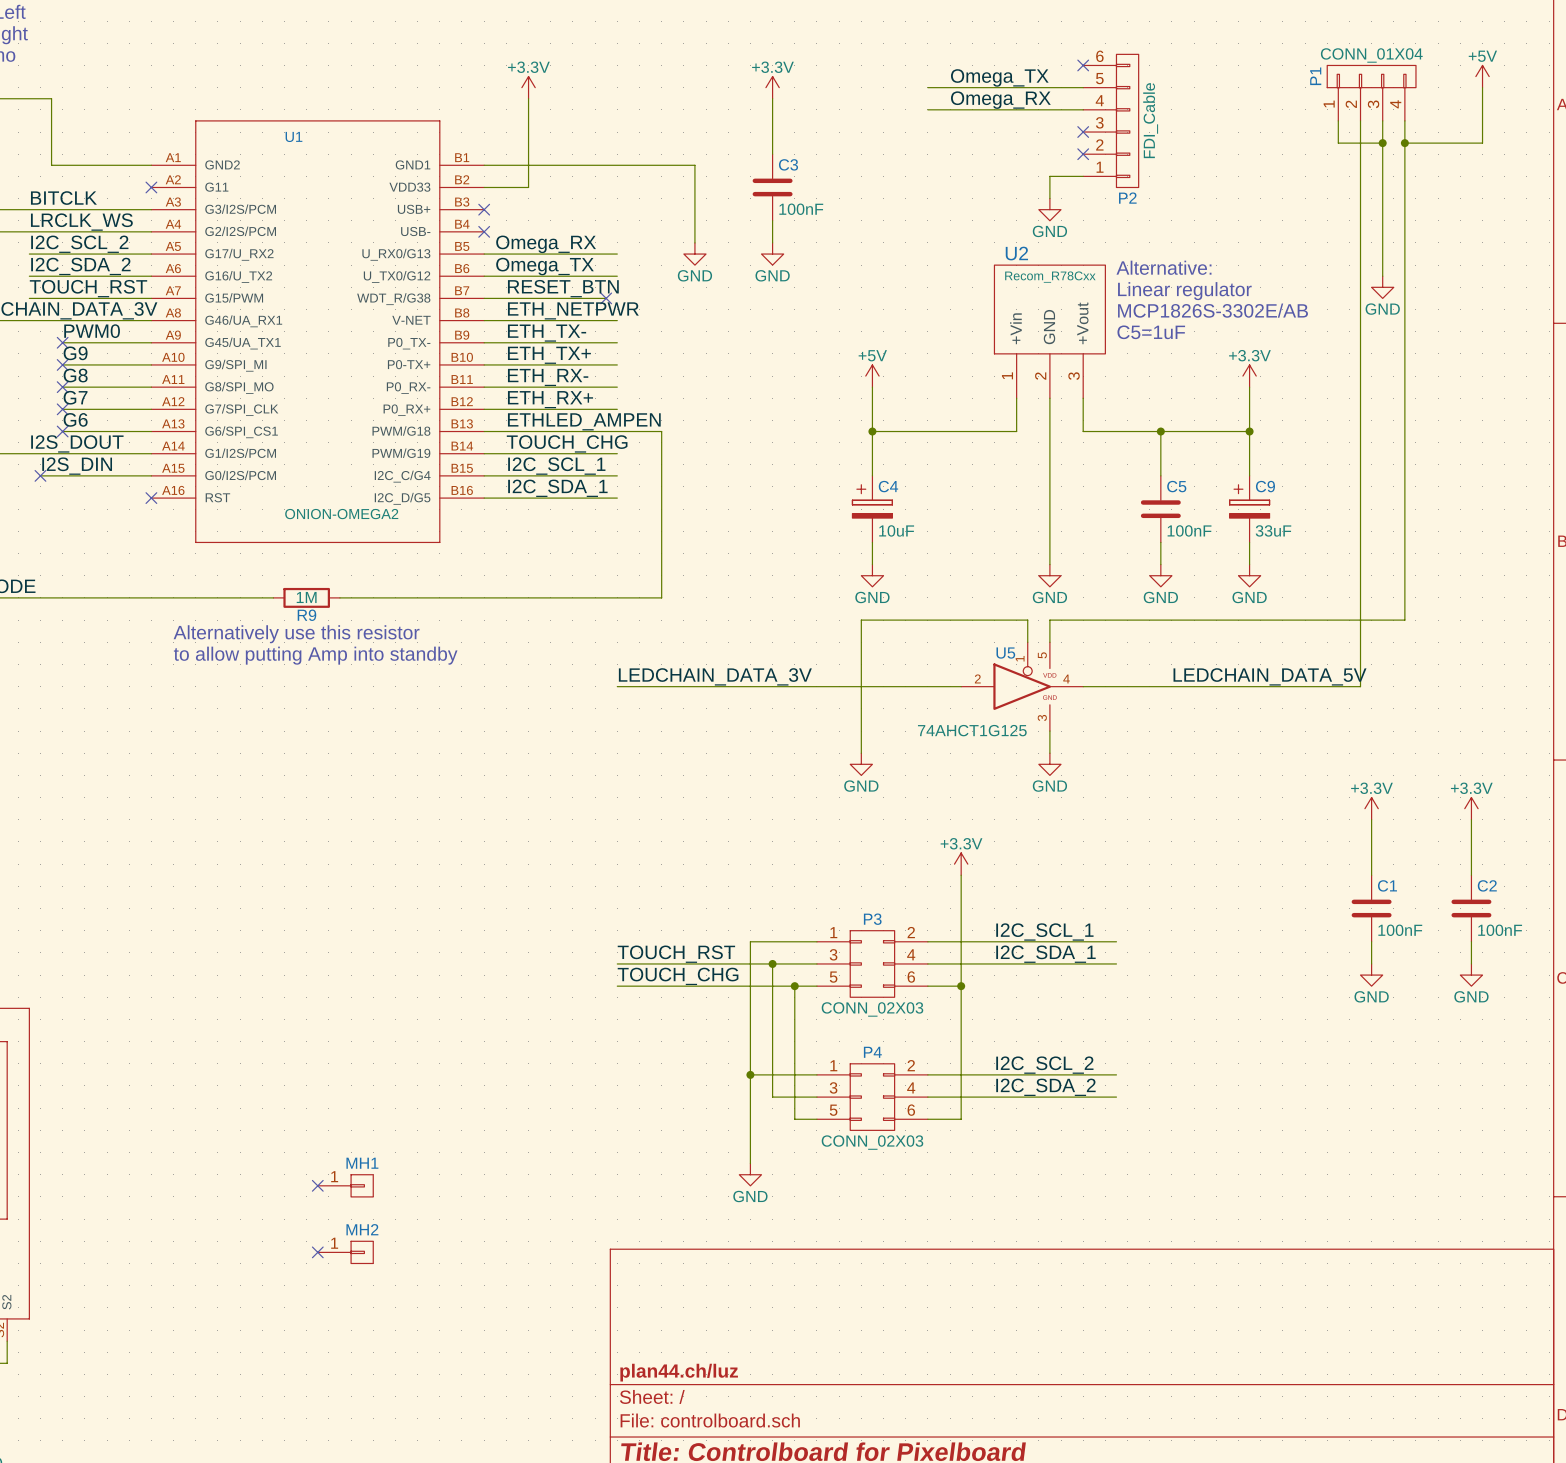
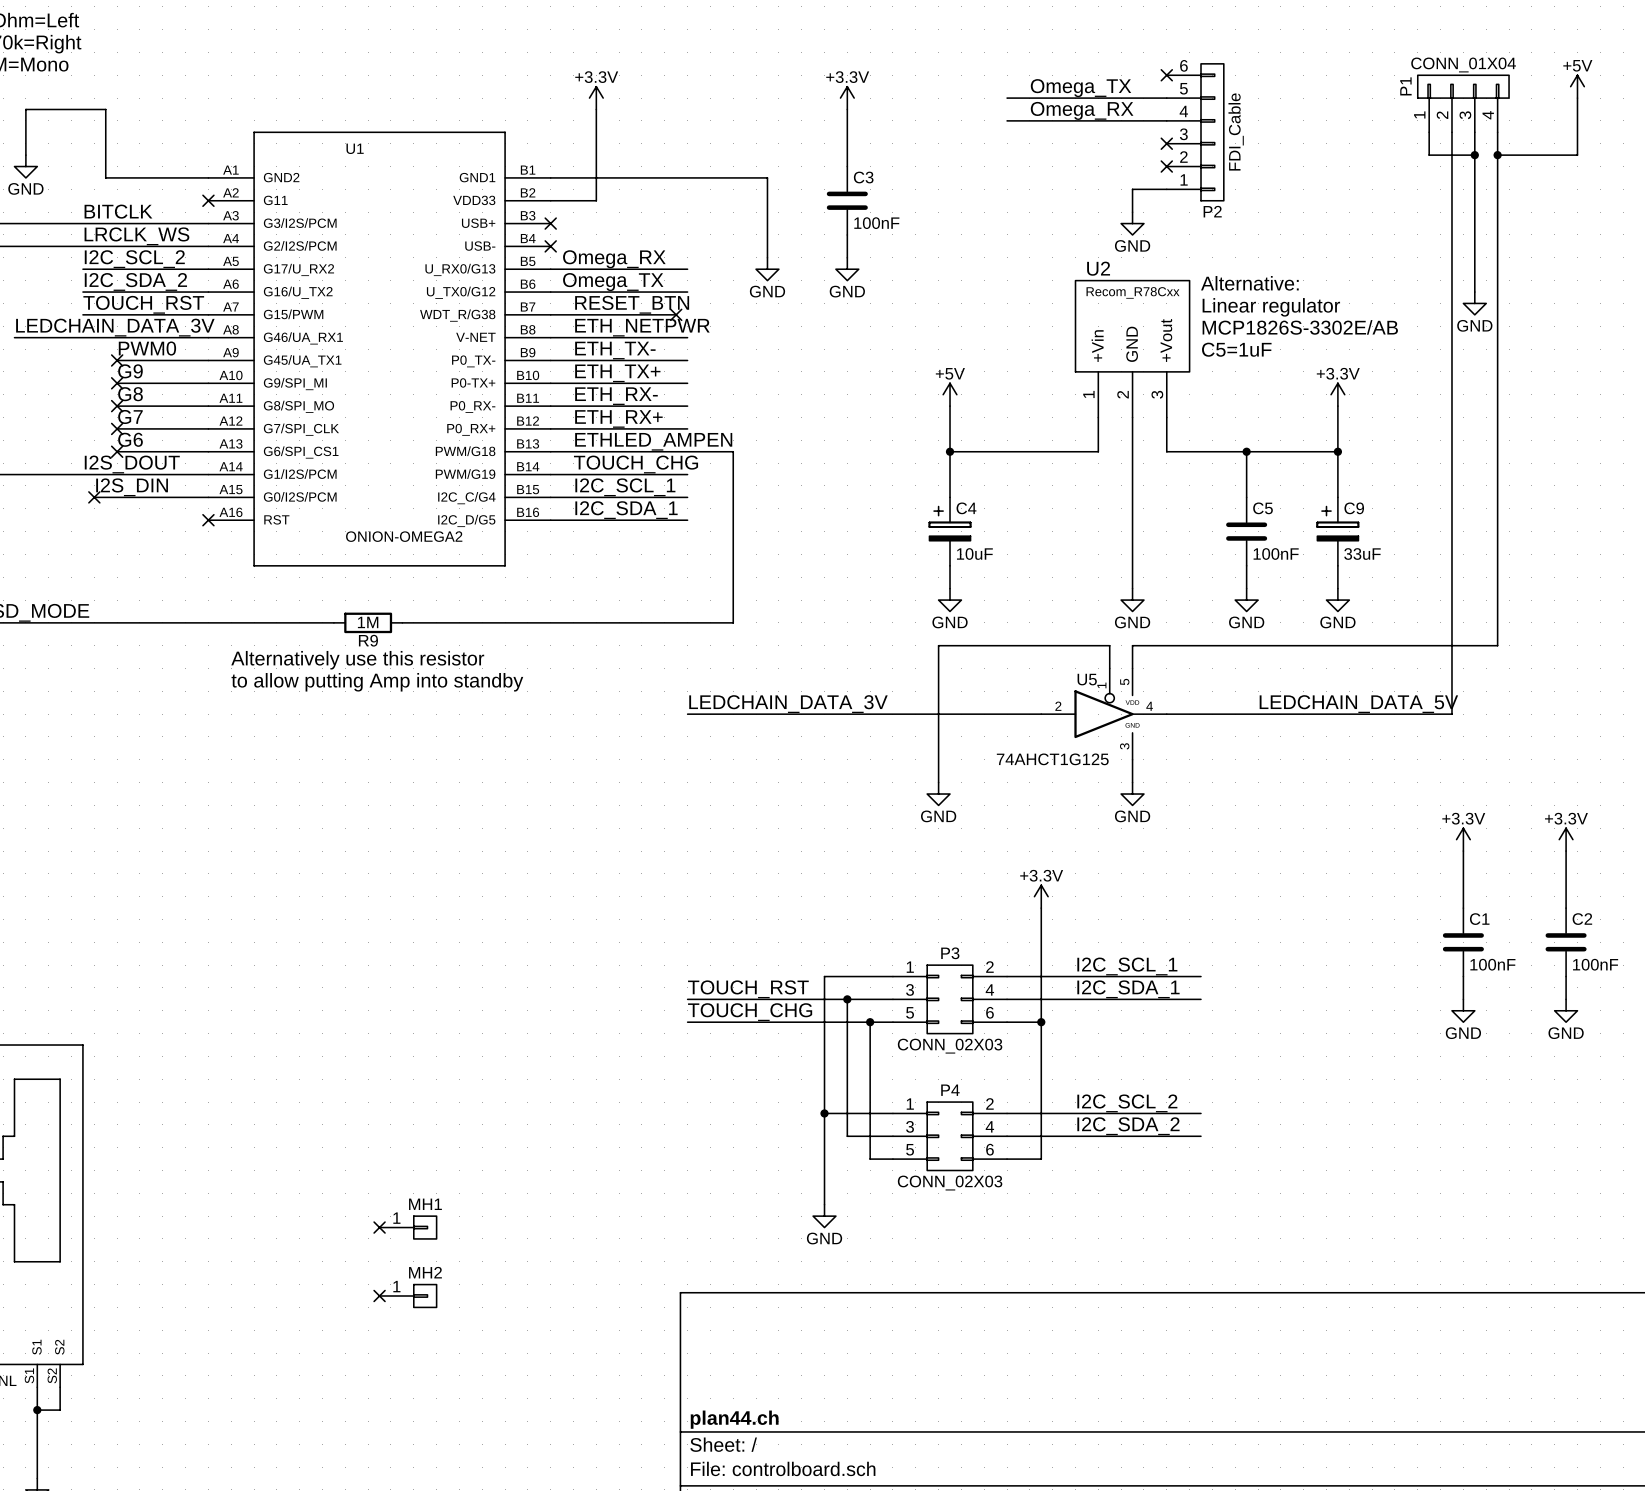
title block: plan44.ch/luz (679, 1372) -> plan44.ch (734, 1419)

